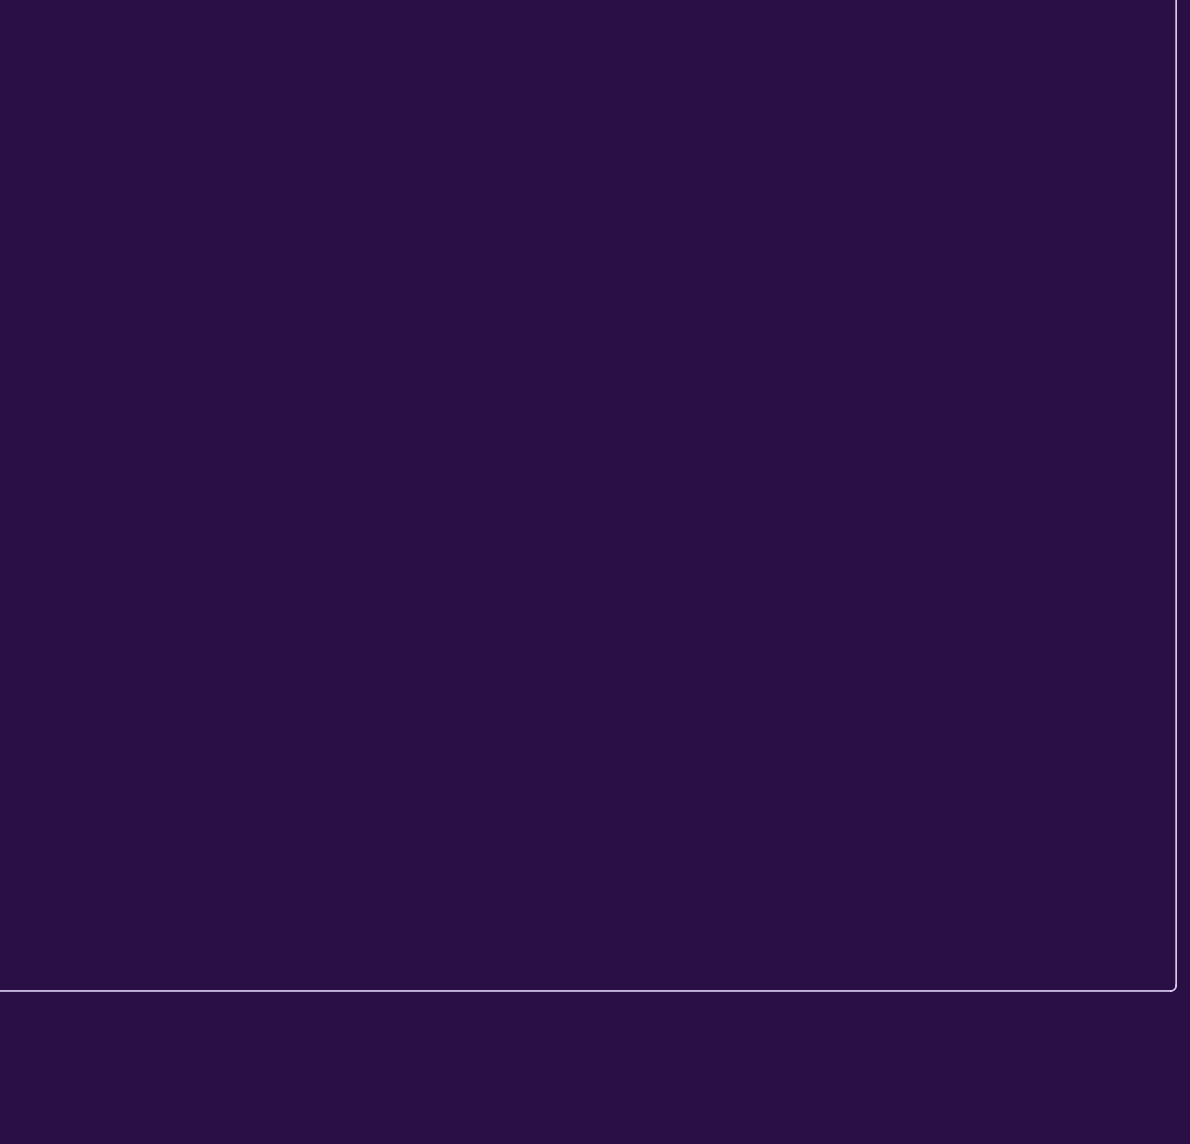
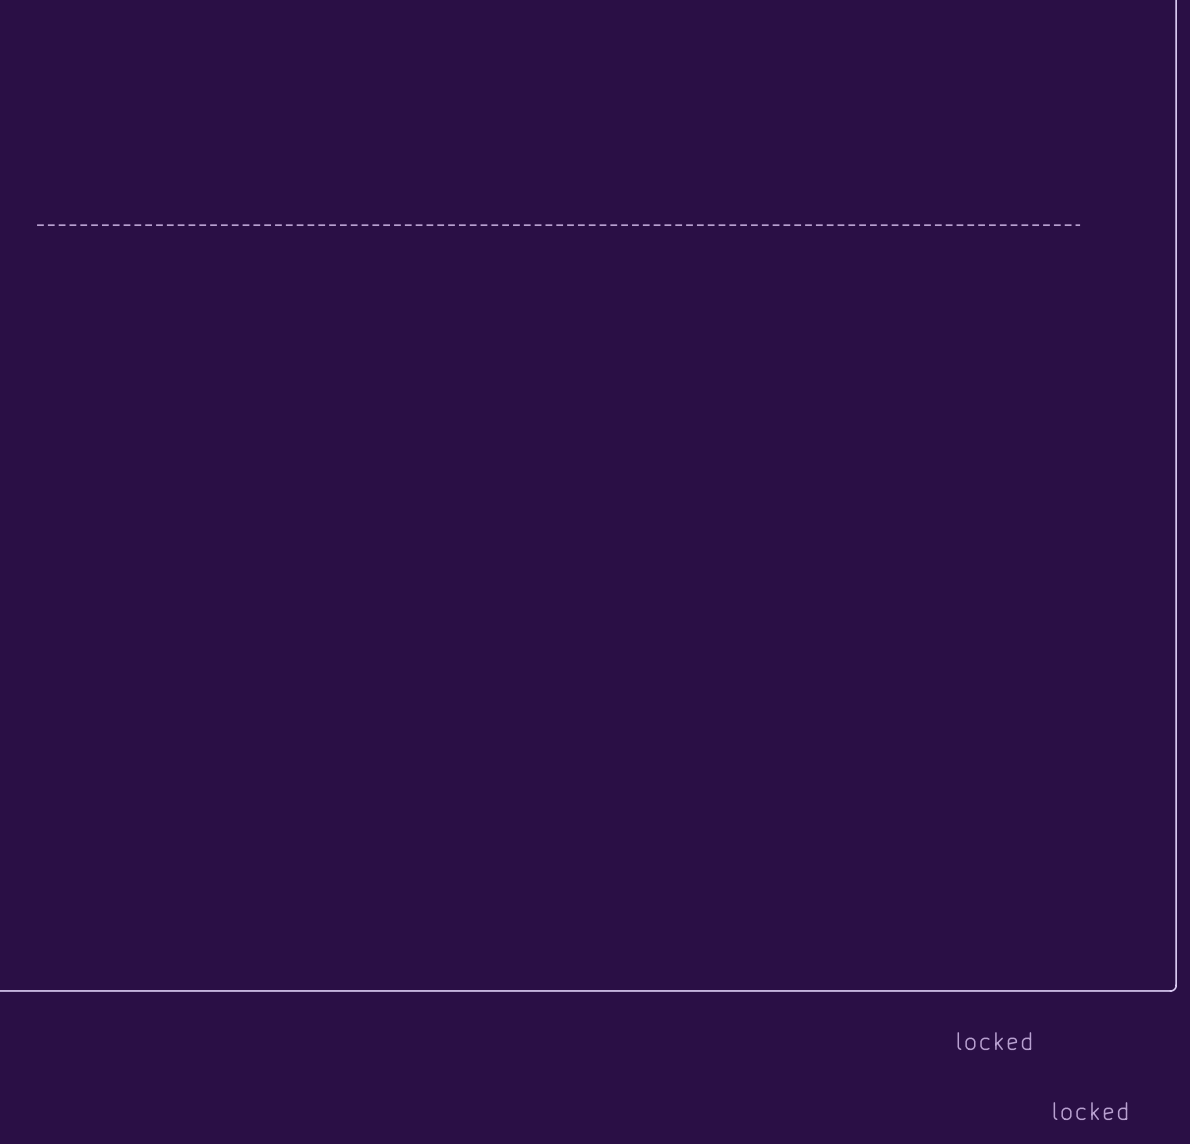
line: none -> (37, 225) (1080, 225)
text: none -> locked (994, 1041)
text: none -> locked (1090, 1111)

